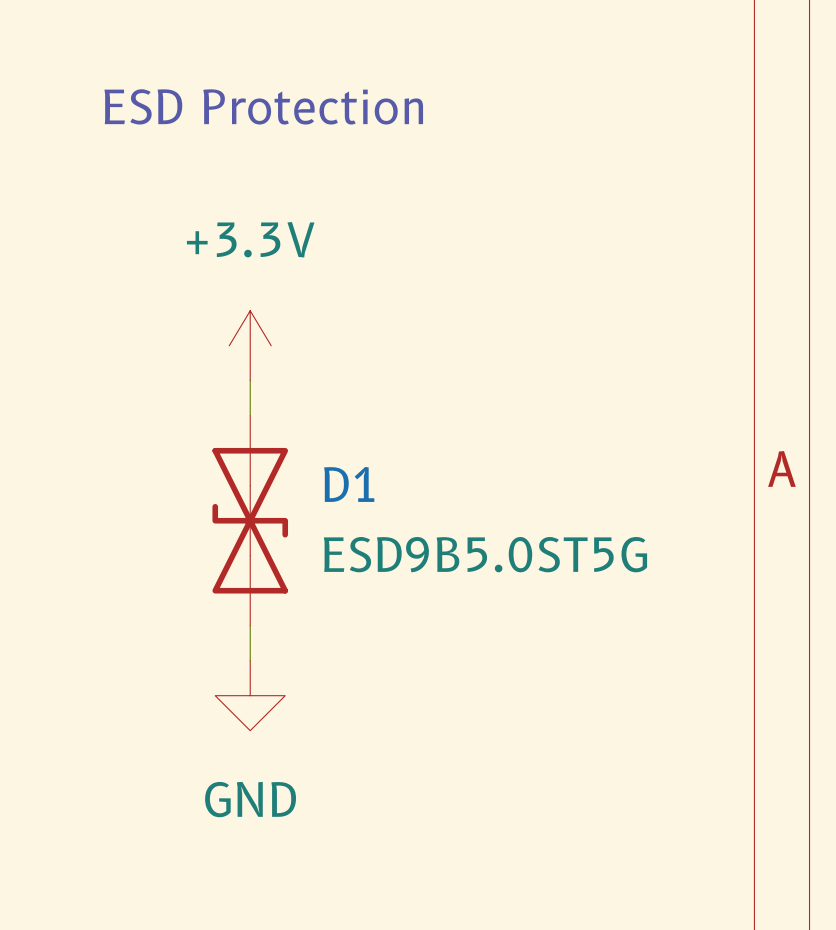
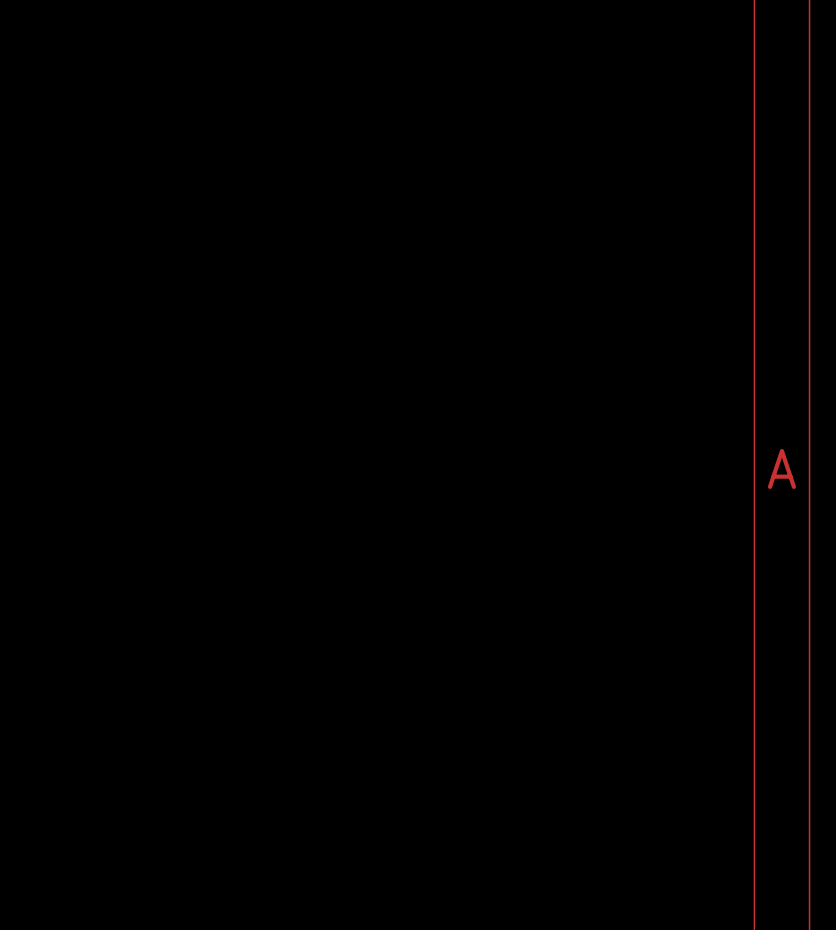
text: ESD Protection (263, 106) -> none
power symbol: +3.3V (250, 345) -> none
wire: (250, 380) (250, 415) -> none
D1: ESD9B5.0ST5G (250, 520) -> none
wire: (250, 625) (250, 660) -> none
power symbol: GND (250, 695) -> none

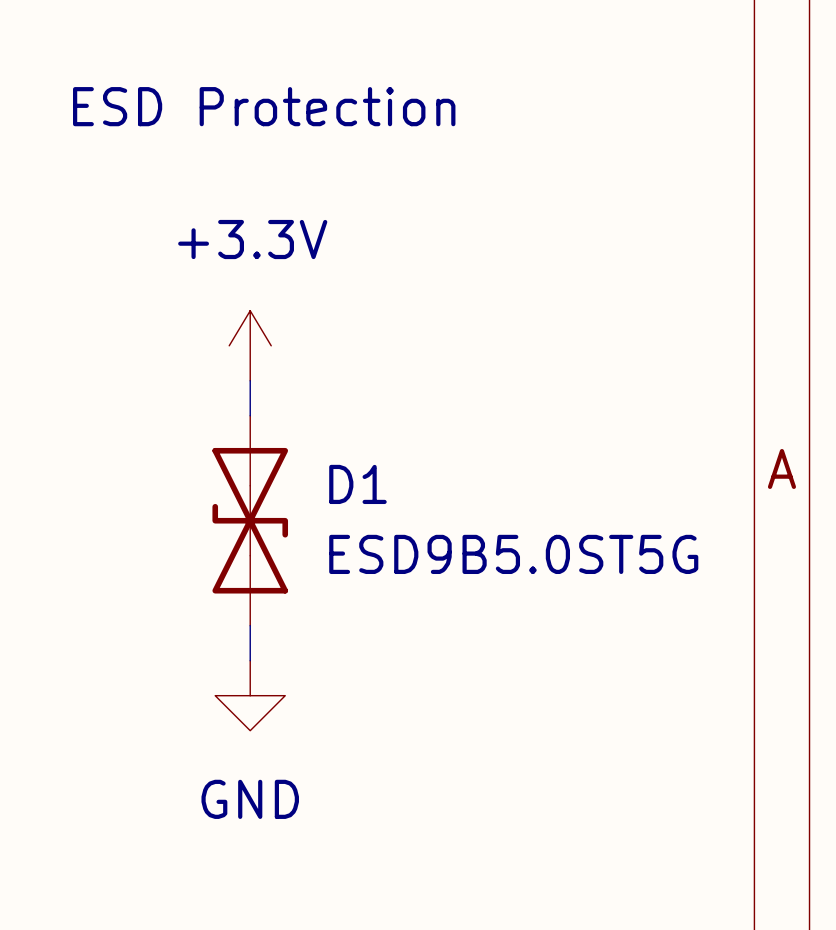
text: none -> ESD Protection (264, 106)
power symbol: none -> +3.3V (250, 345)
wire: none -> (250, 380) (250, 415)
D1: none -> ESD9B5.0ST5G (250, 520)
wire: none -> (250, 625) (250, 660)
power symbol: none -> GND (250, 695)

